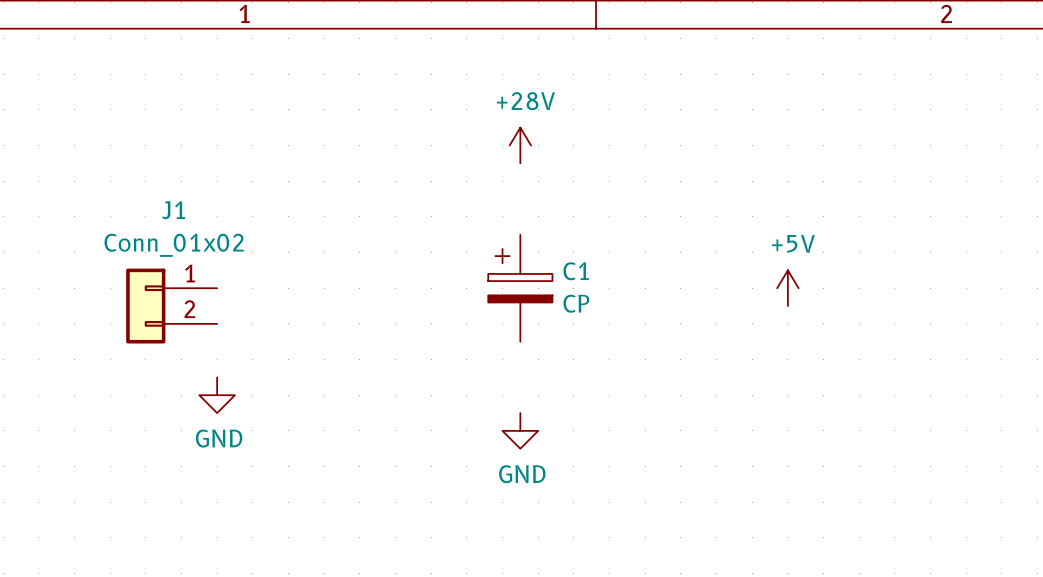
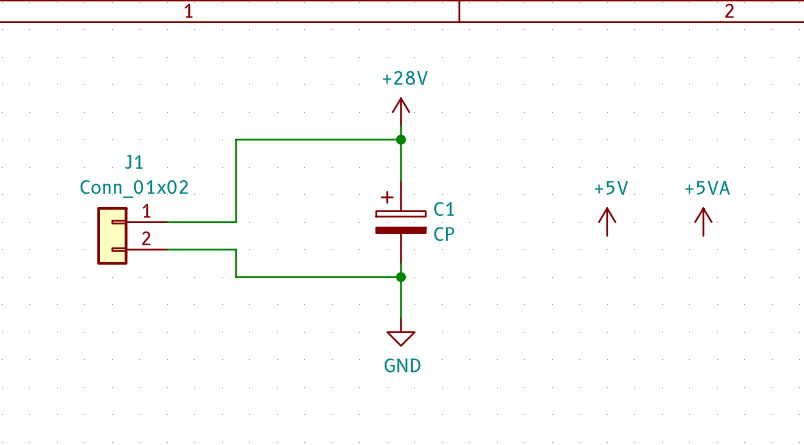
wire: none -> (401, 125) (401, 180)
wire: none -> (401, 139) (236, 139) (236, 222) (167, 222)
junction: none -> (401, 139)
power symbol: none -> +5VA (703, 222)
wire: none -> (167, 249) (236, 249) (236, 277) (401, 277)
wire: none -> (401, 263) (401, 318)
junction: none -> (401, 277)
power symbol: GND (217, 395) -> none

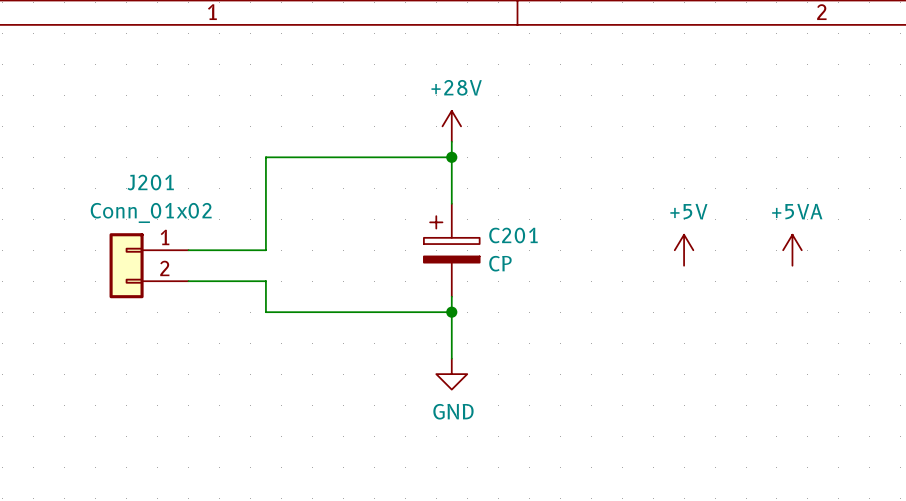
J1 name: J1 (133, 162) -> J201 (150, 182)
C1 name: C1 (444, 209) -> C201 (513, 235)

